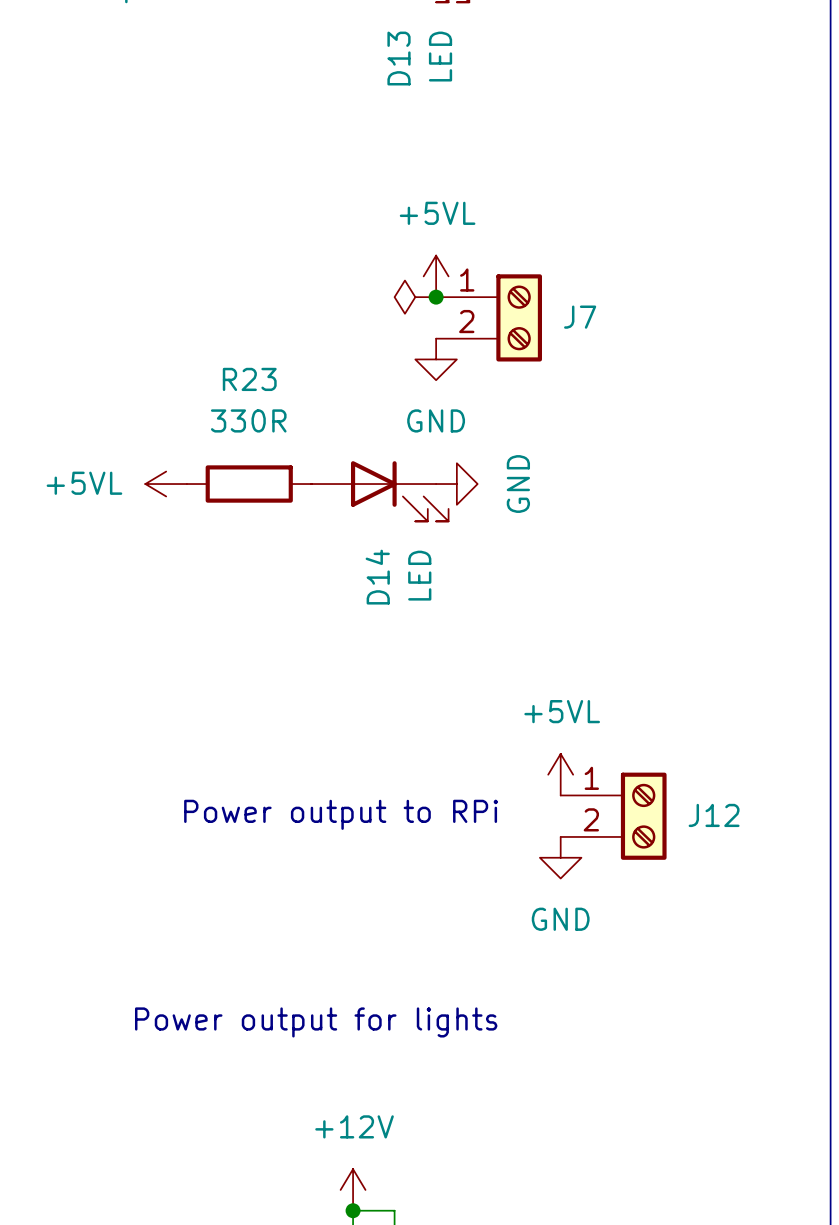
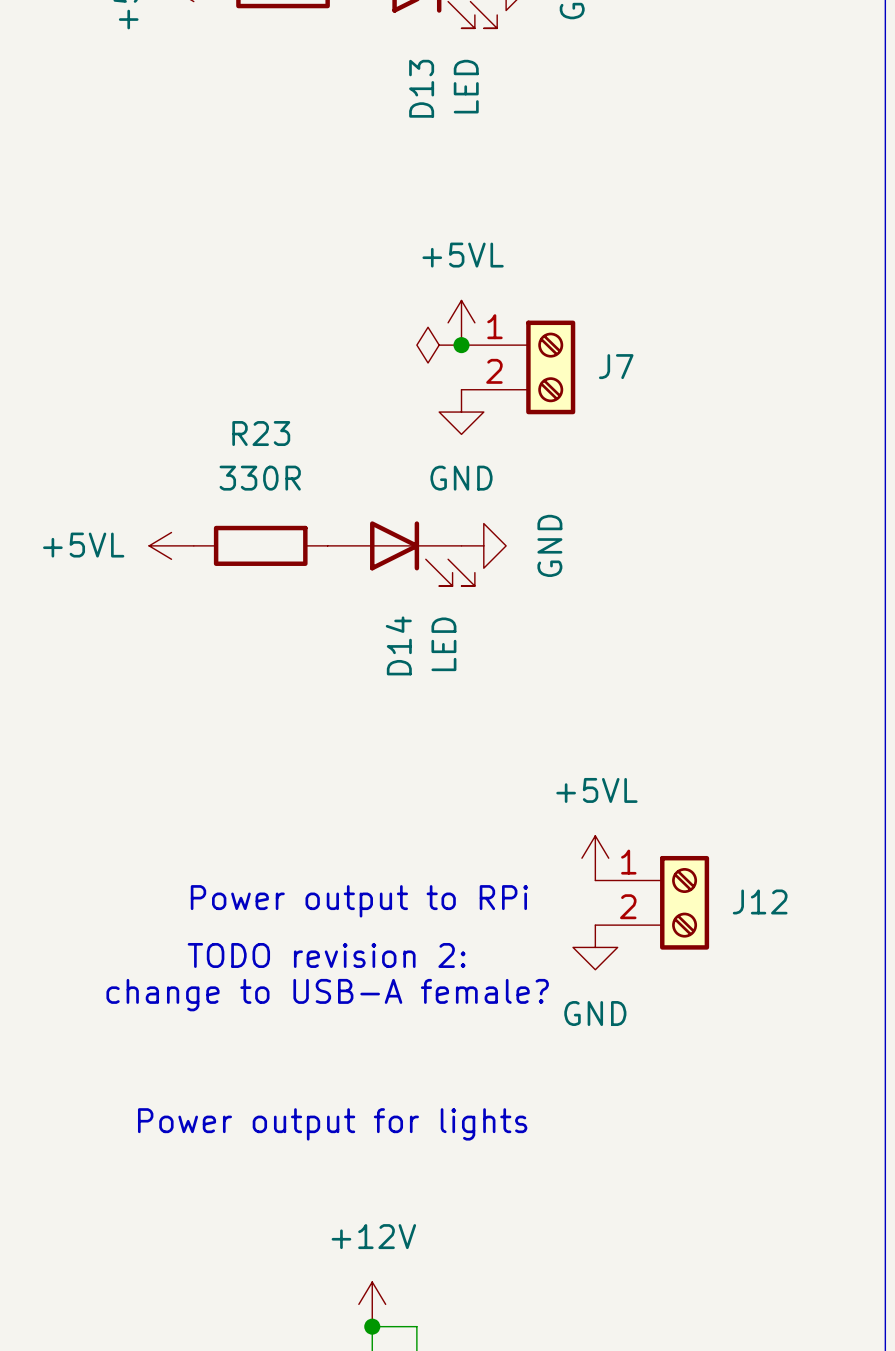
text: none -> TODO revision 2: (326, 955)
text: none -> change to USB-A female? (327, 995)

